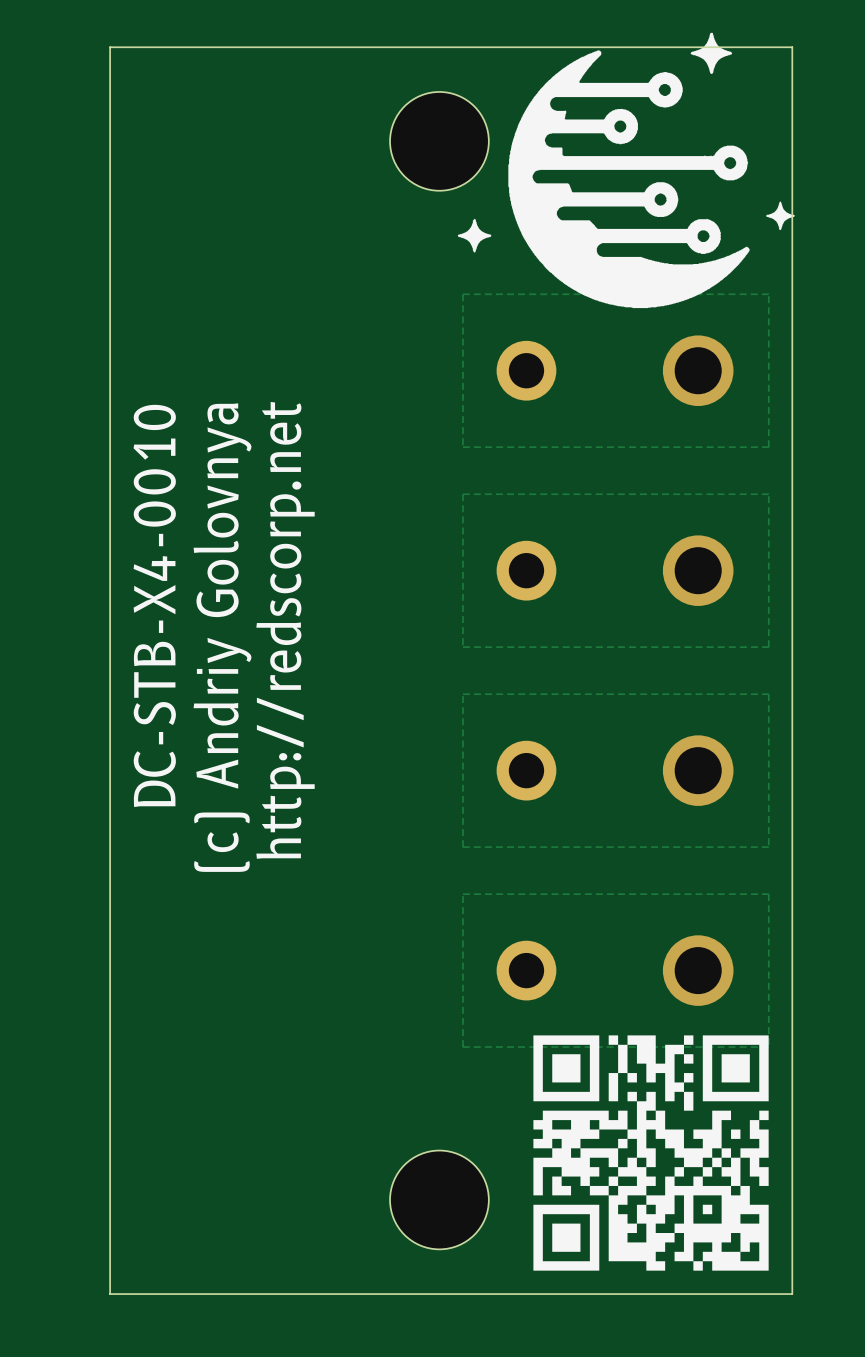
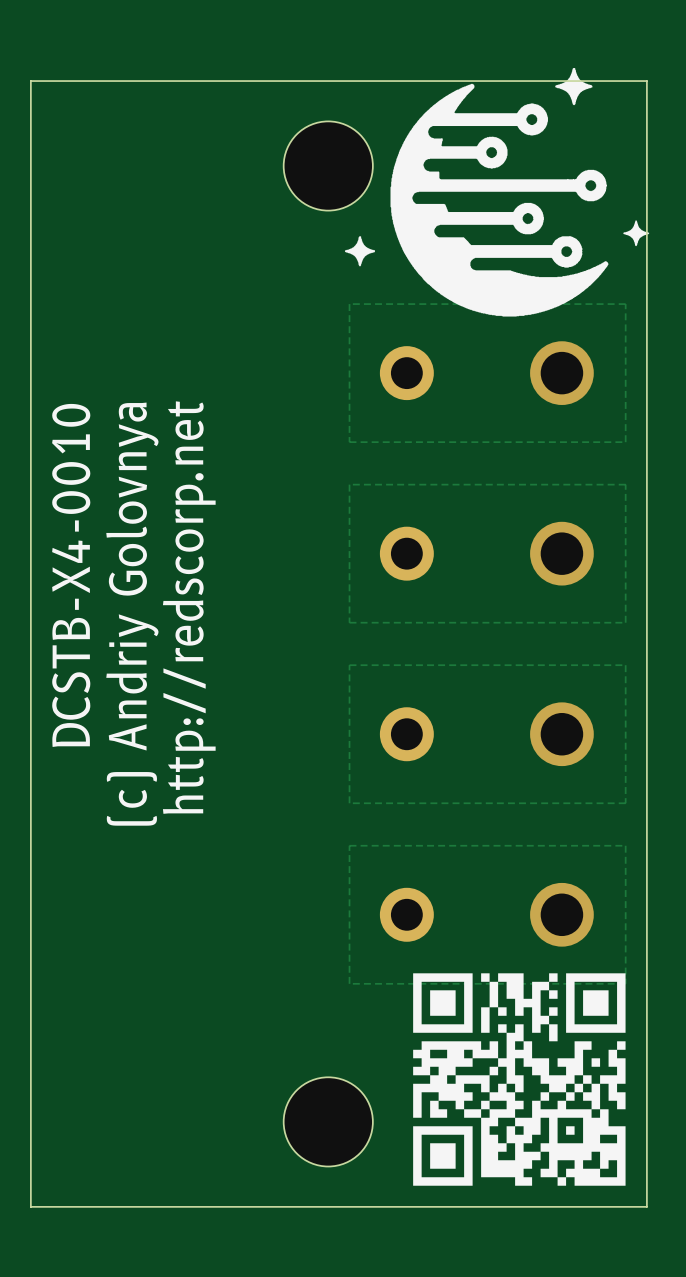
text: DC-STB-X4-0010 (154, 605) -> DCSTB-X4-0010 (71, 575)

